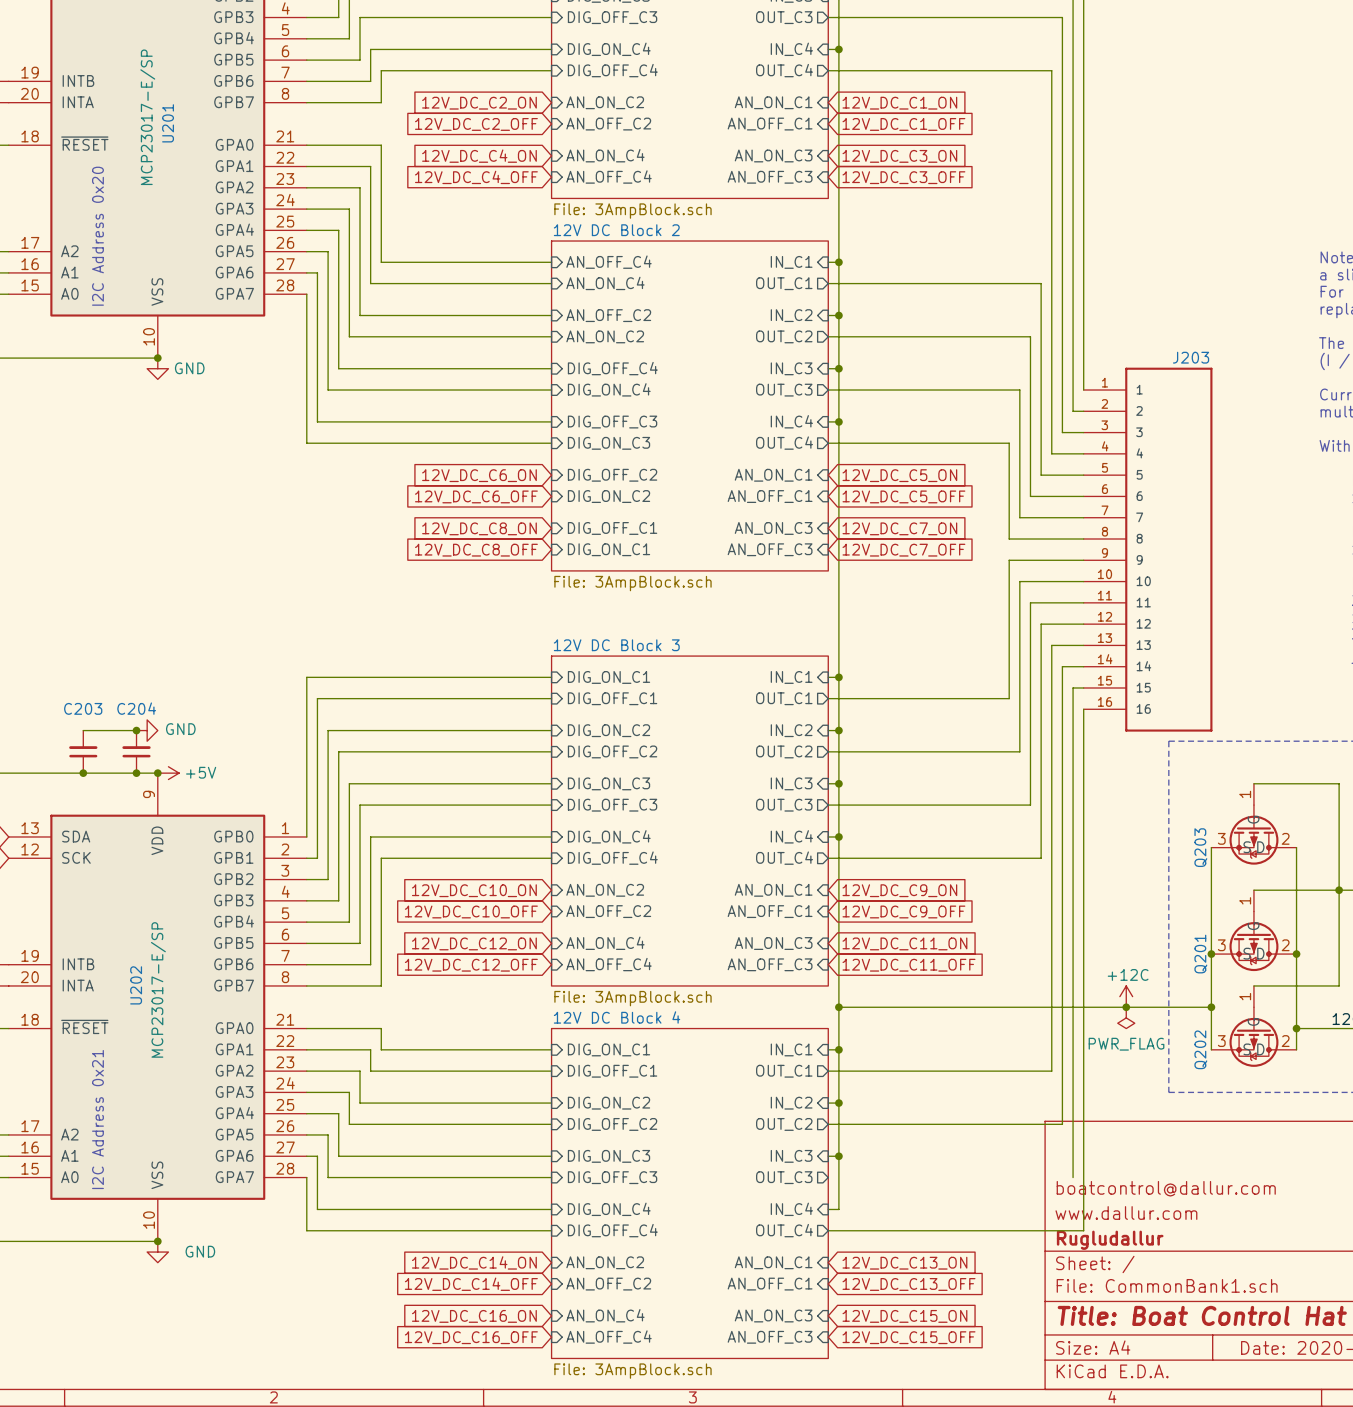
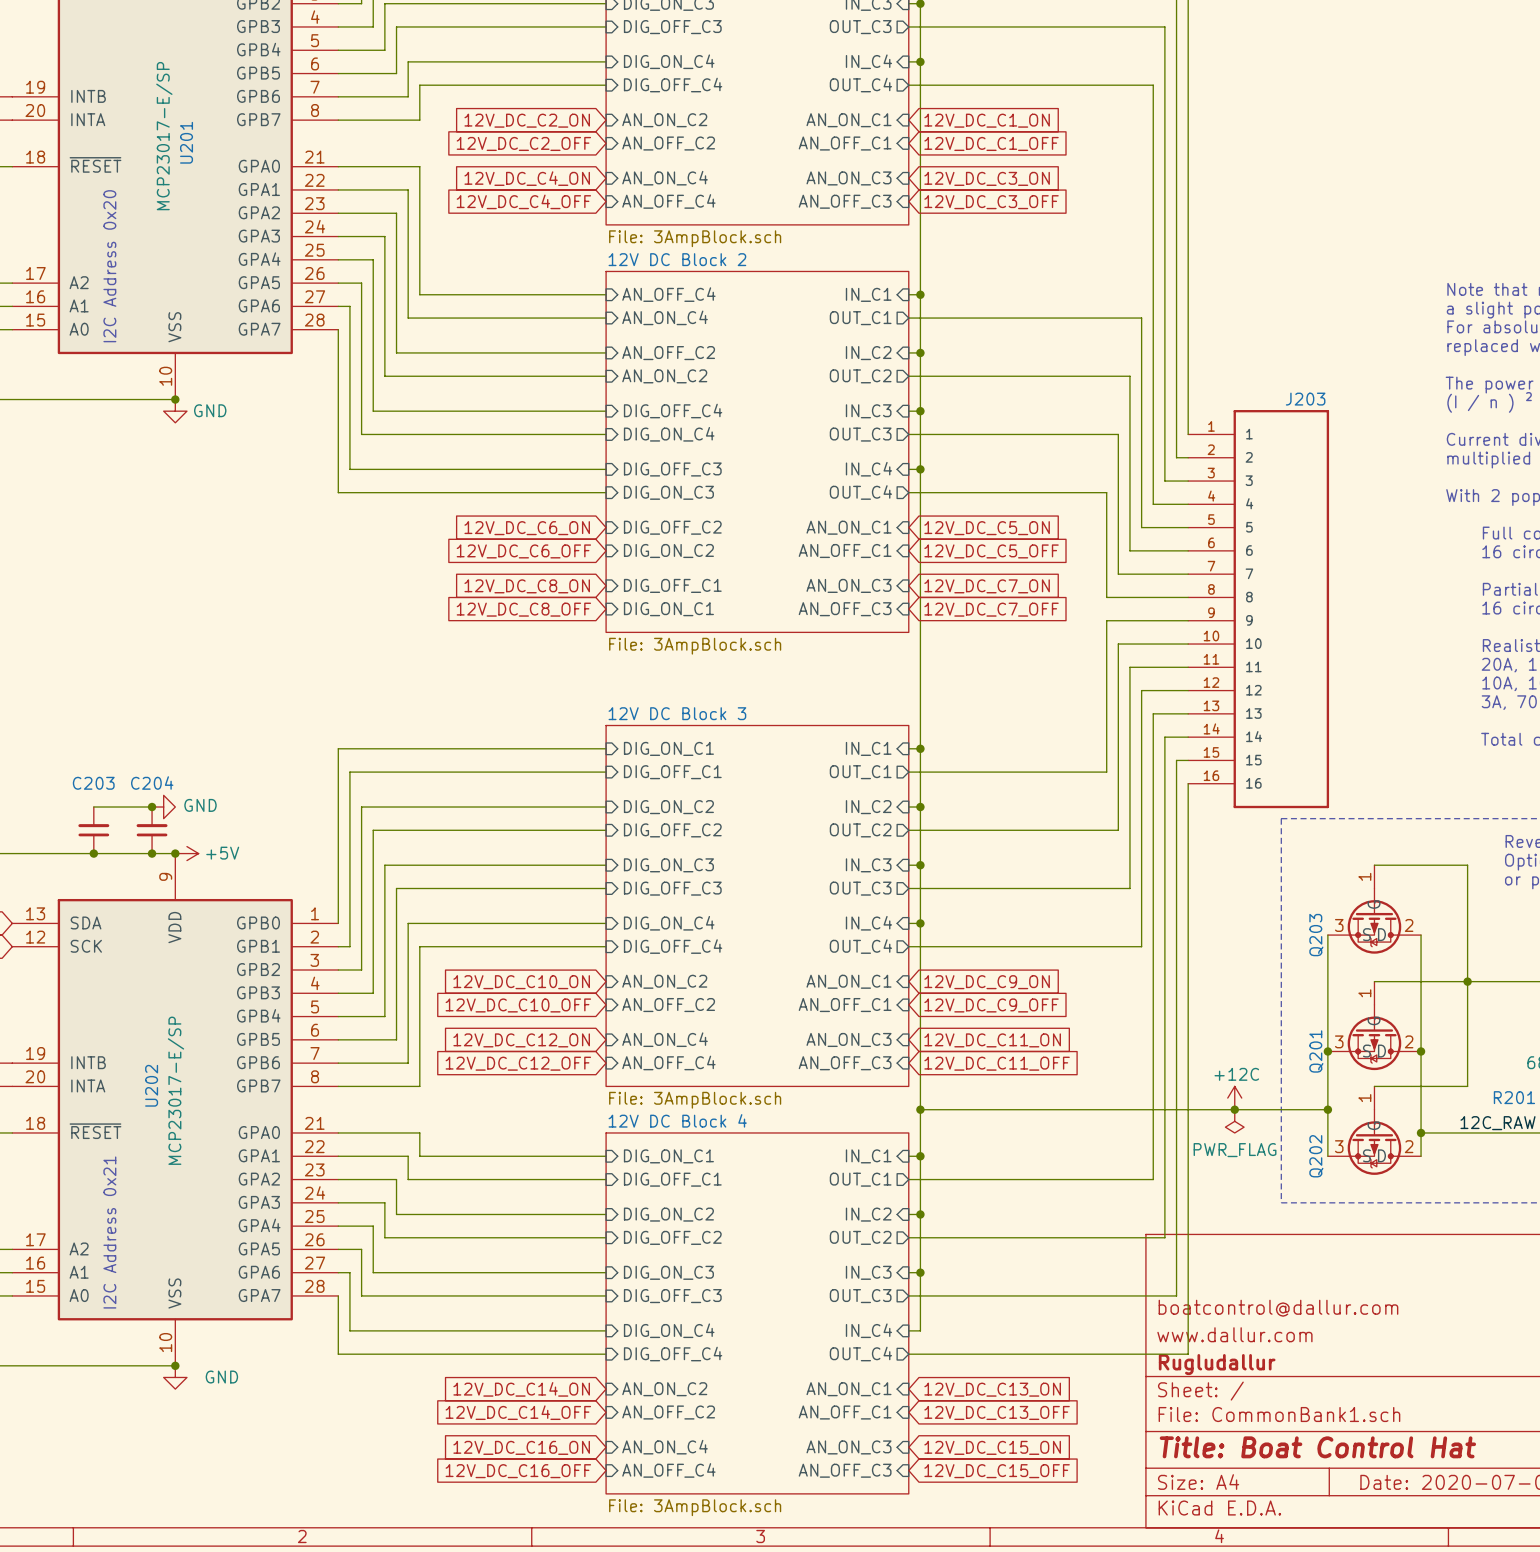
wire: none -> (908, 1295) (1176, 1295)

